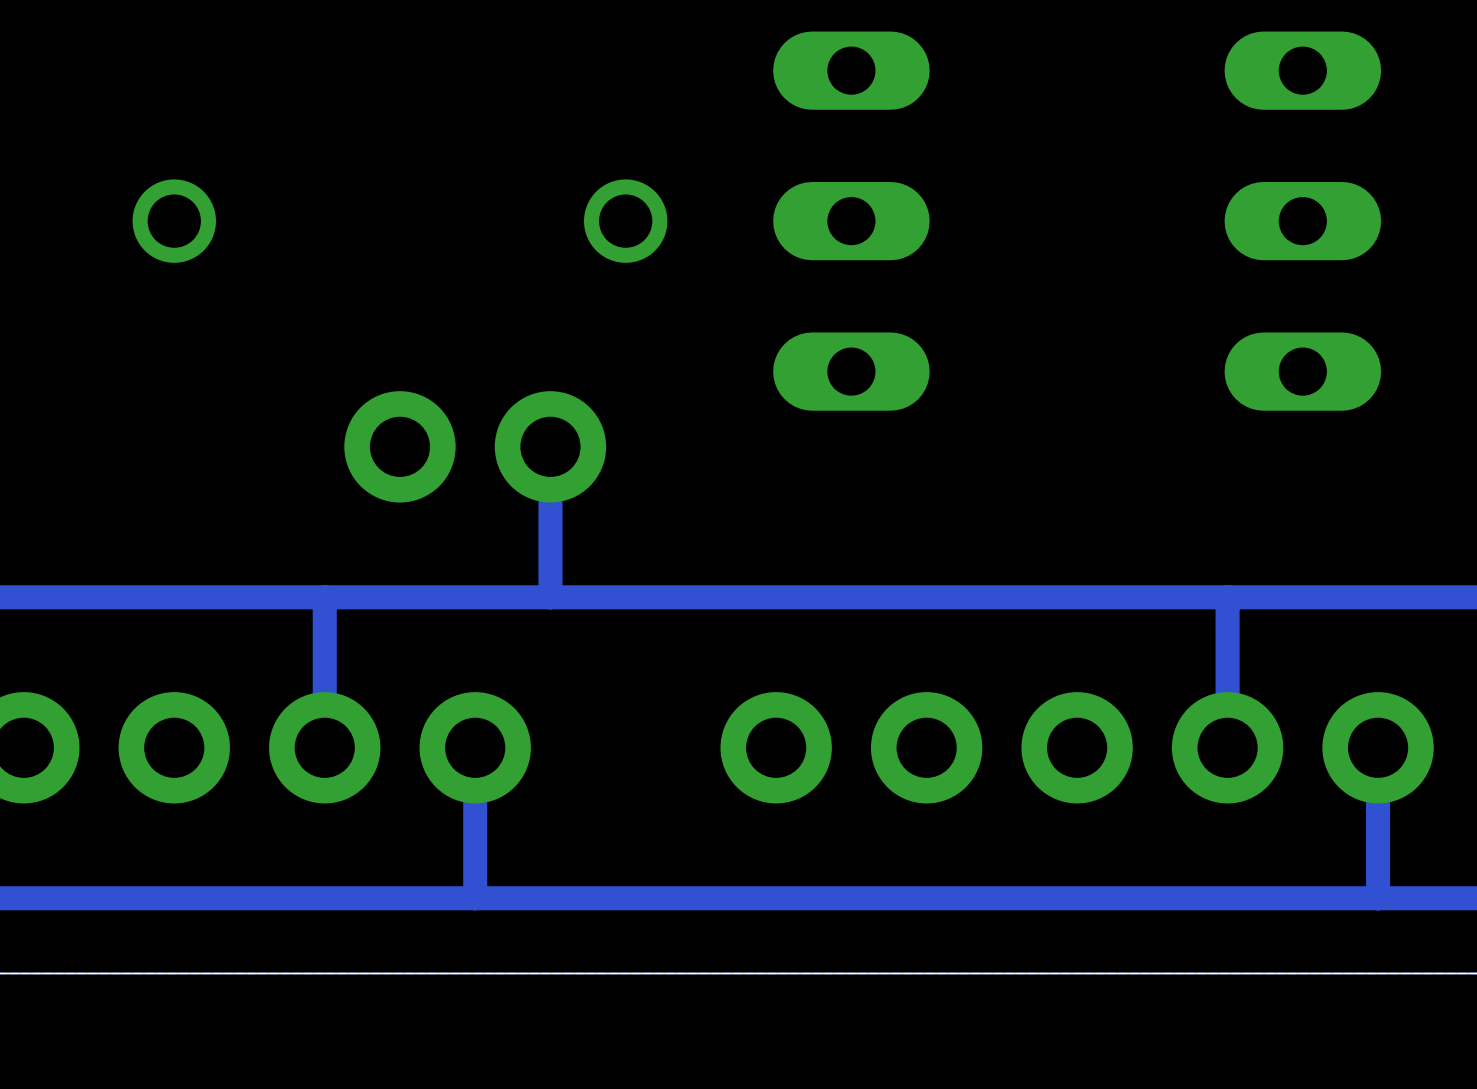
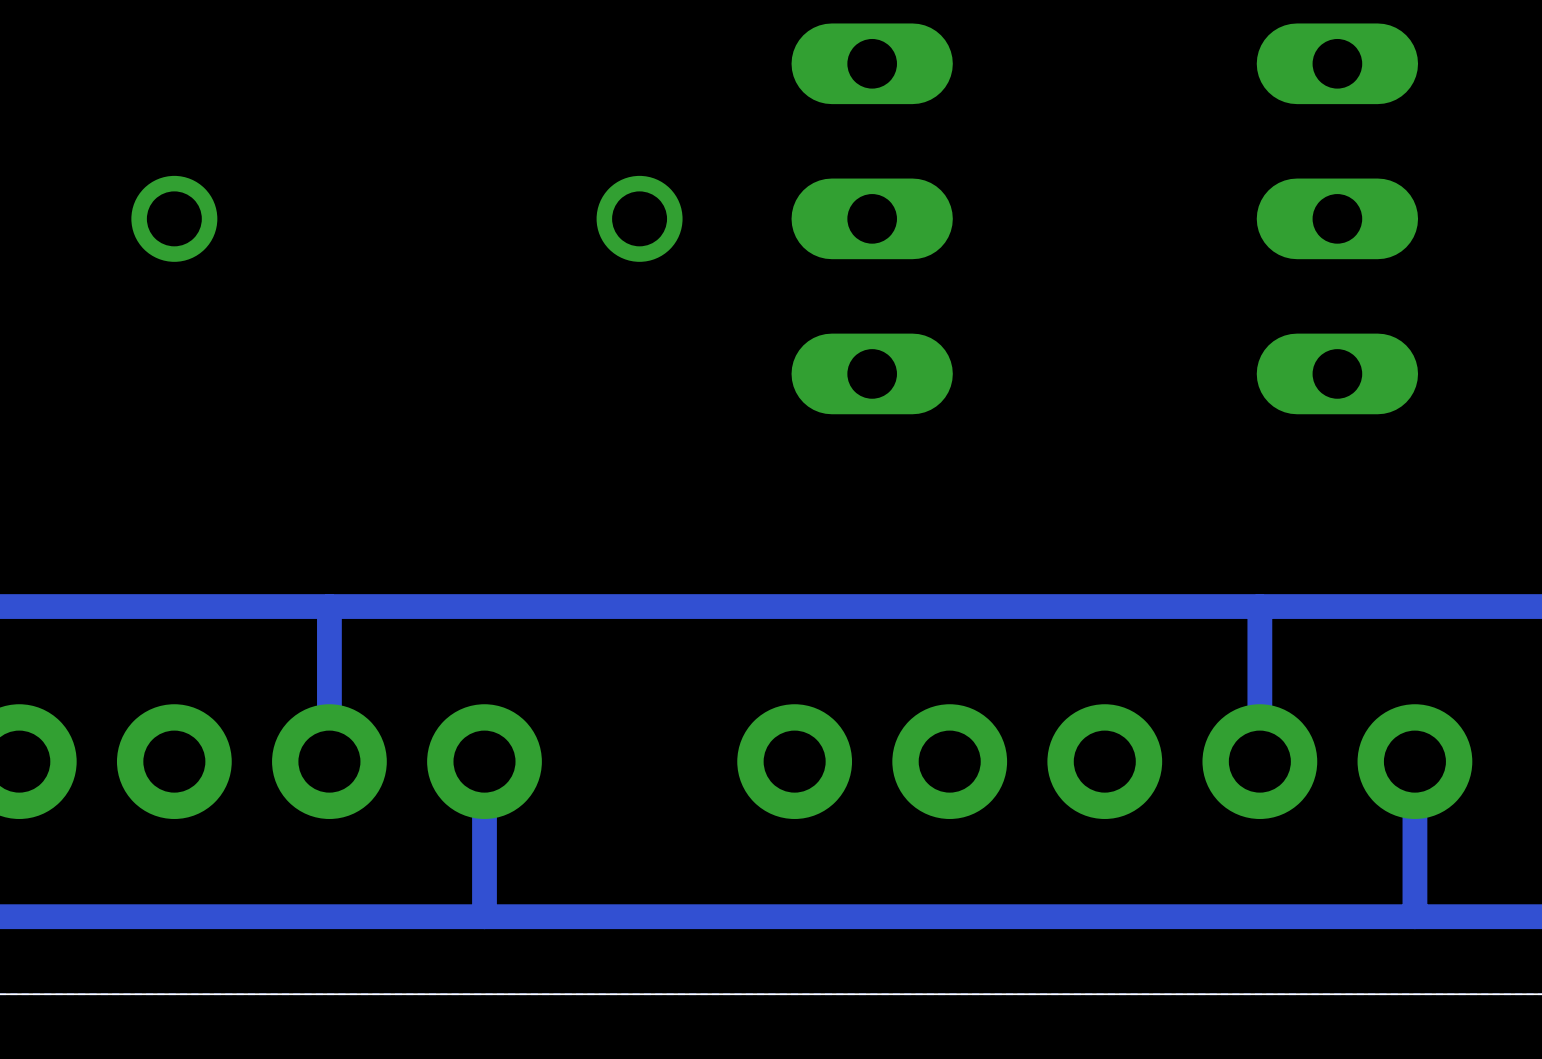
part: (475, 446) -> none
track: (550, 446) (550, 597) -> none

